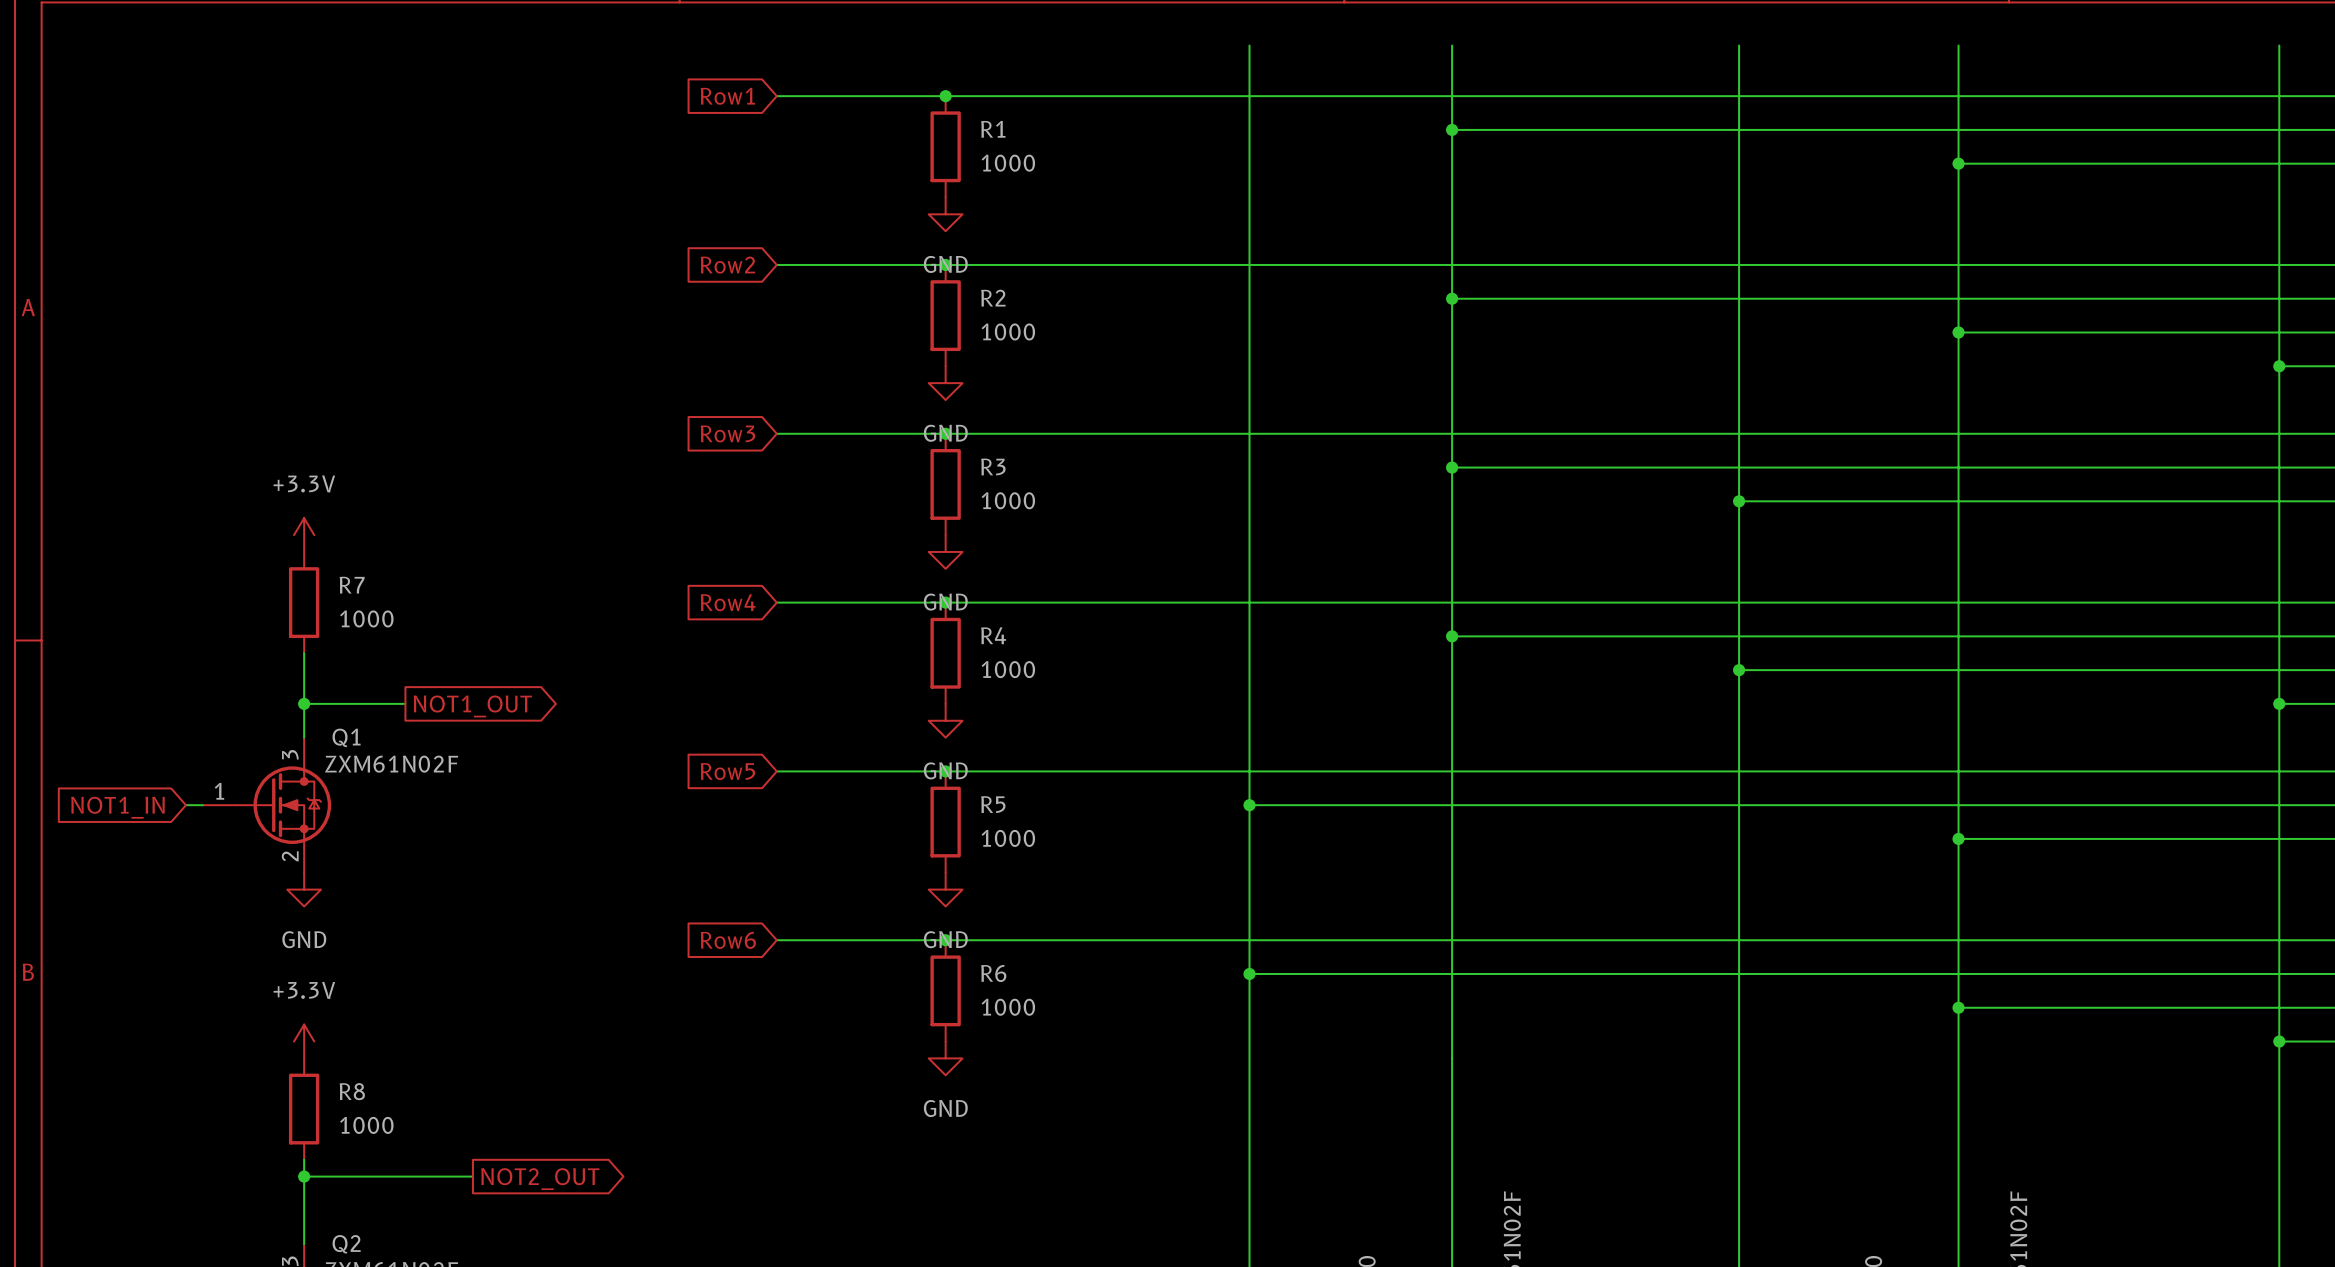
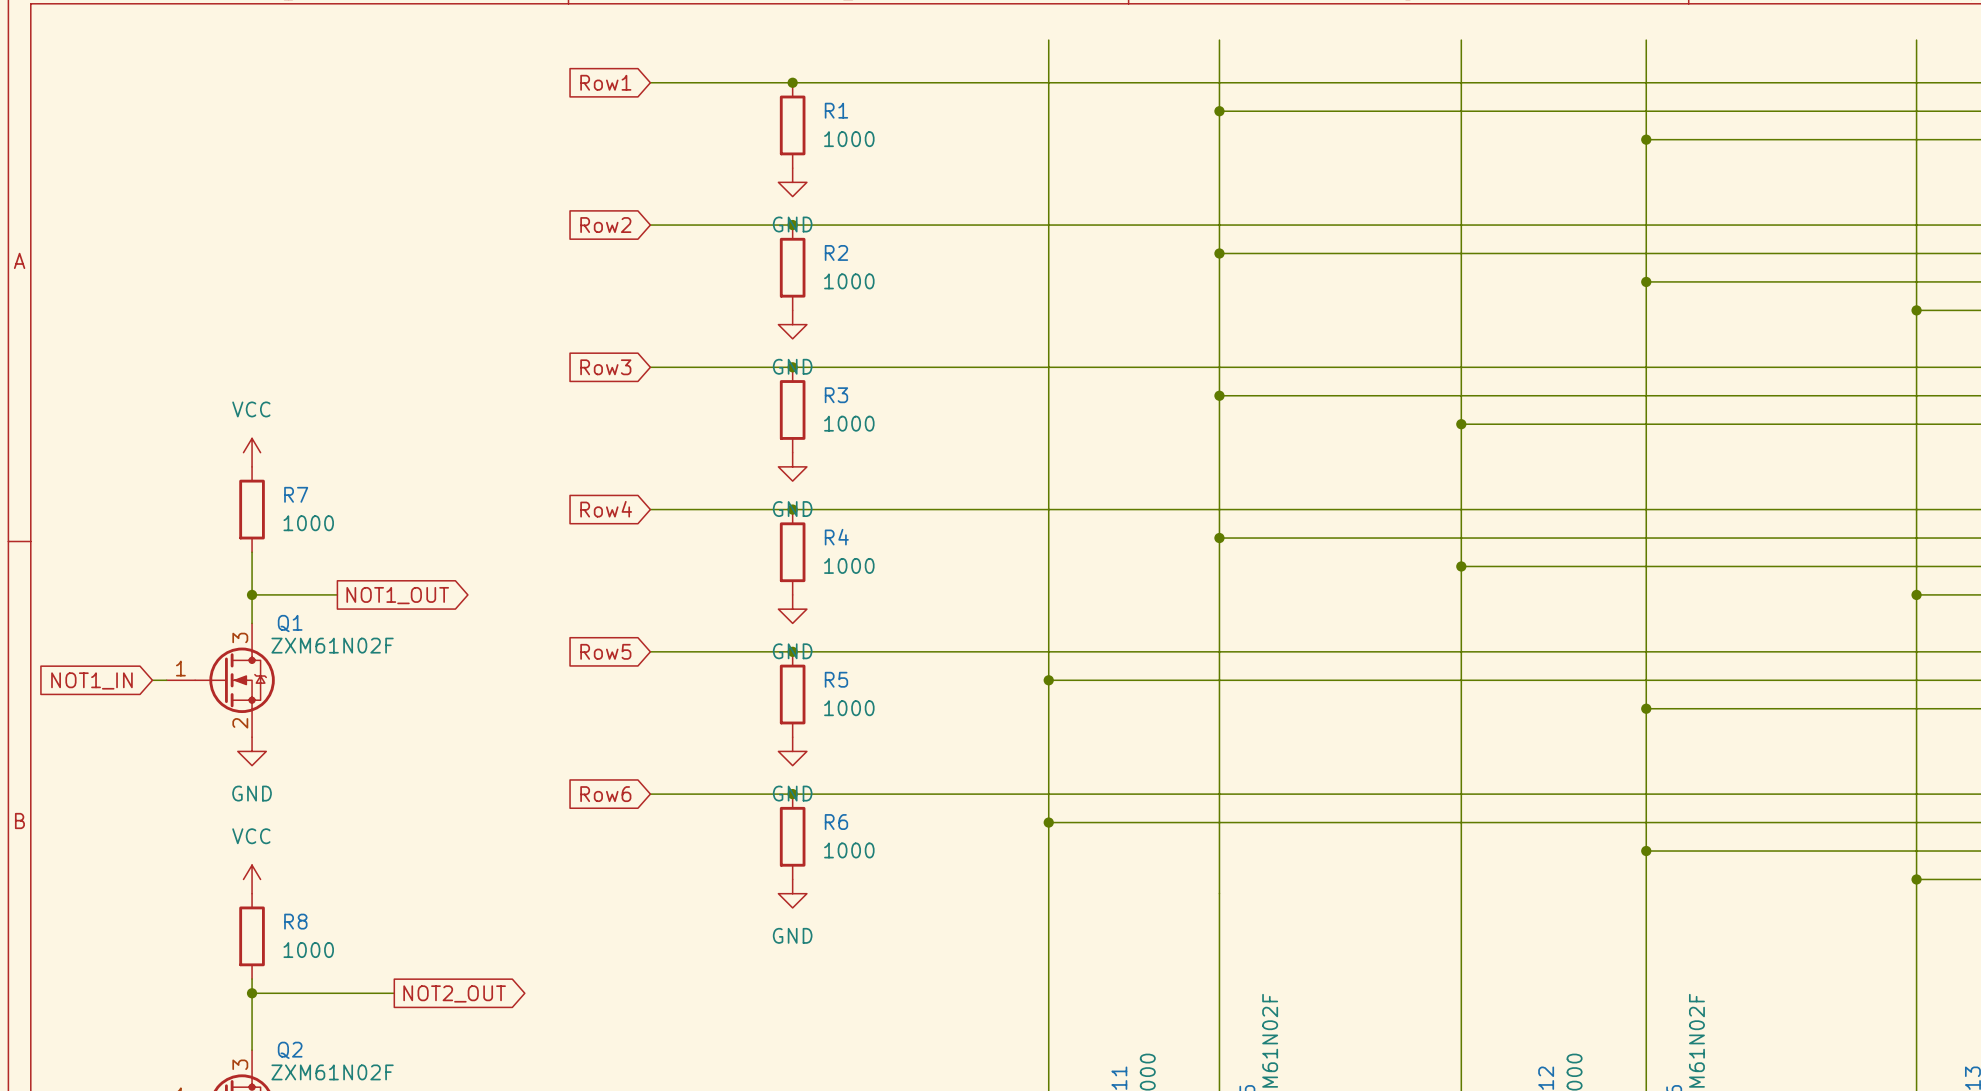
power symbol: +3.3V (304, 535) -> VCC (252, 452)
power symbol: +3.3V (304, 1041) -> VCC (252, 879)

